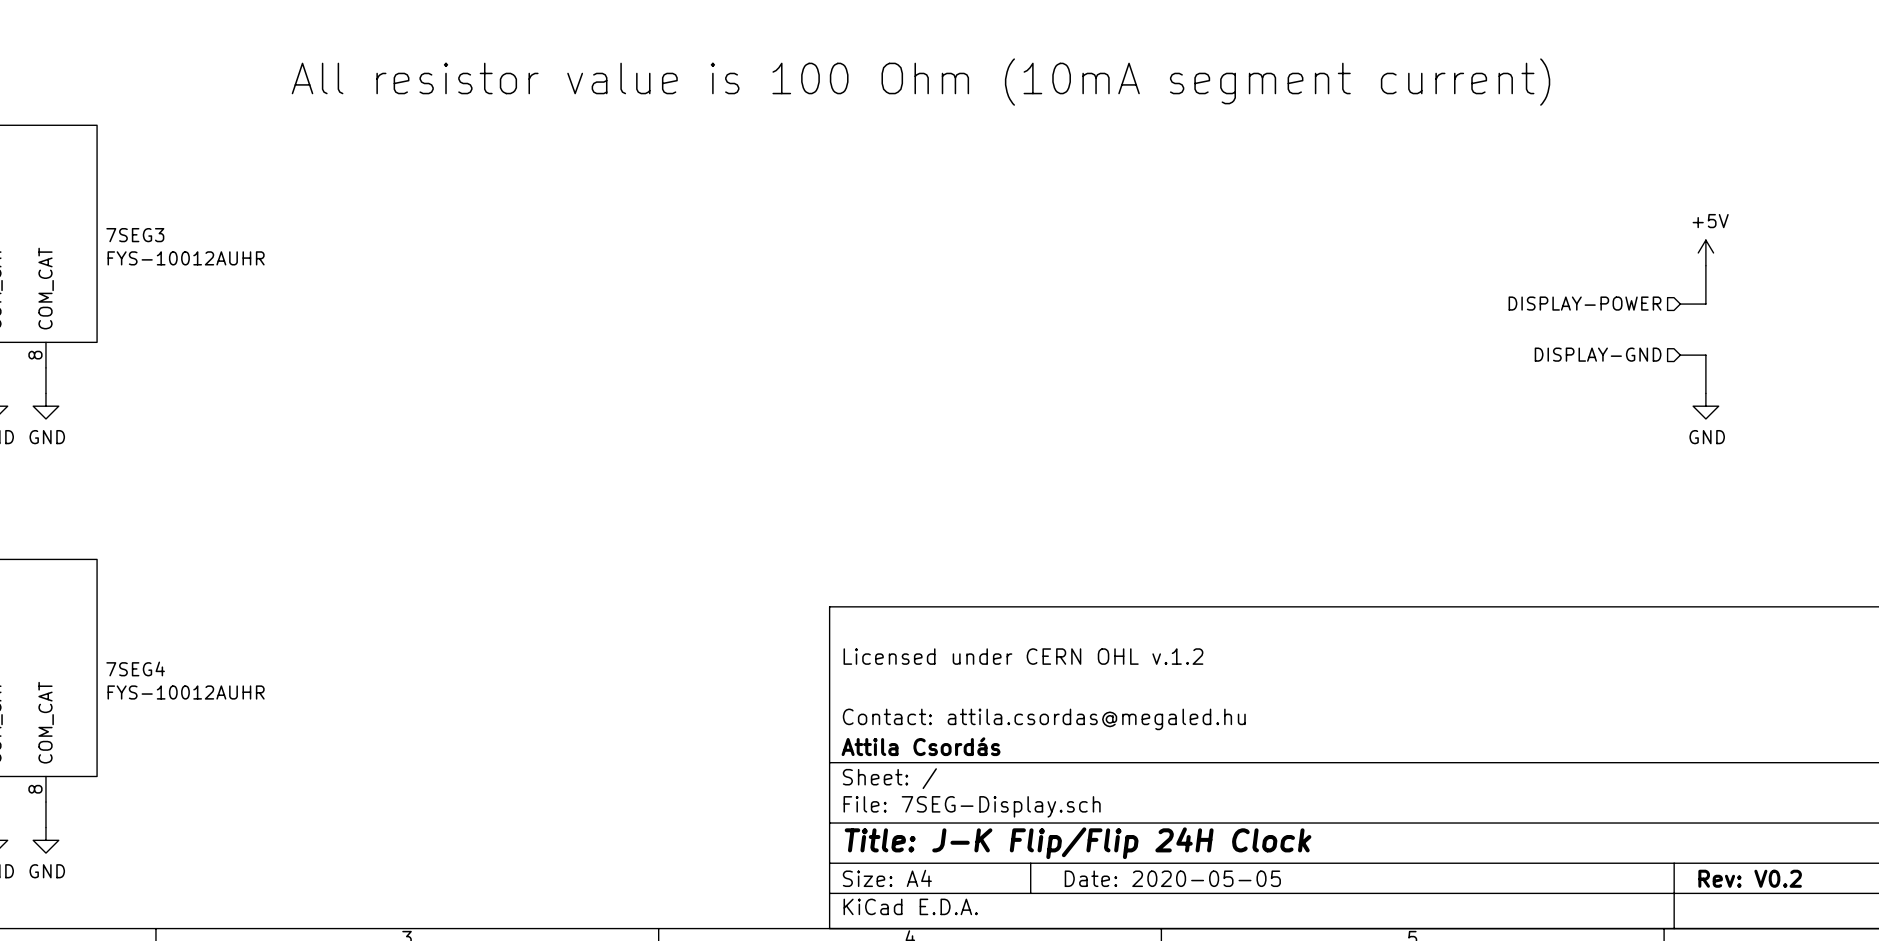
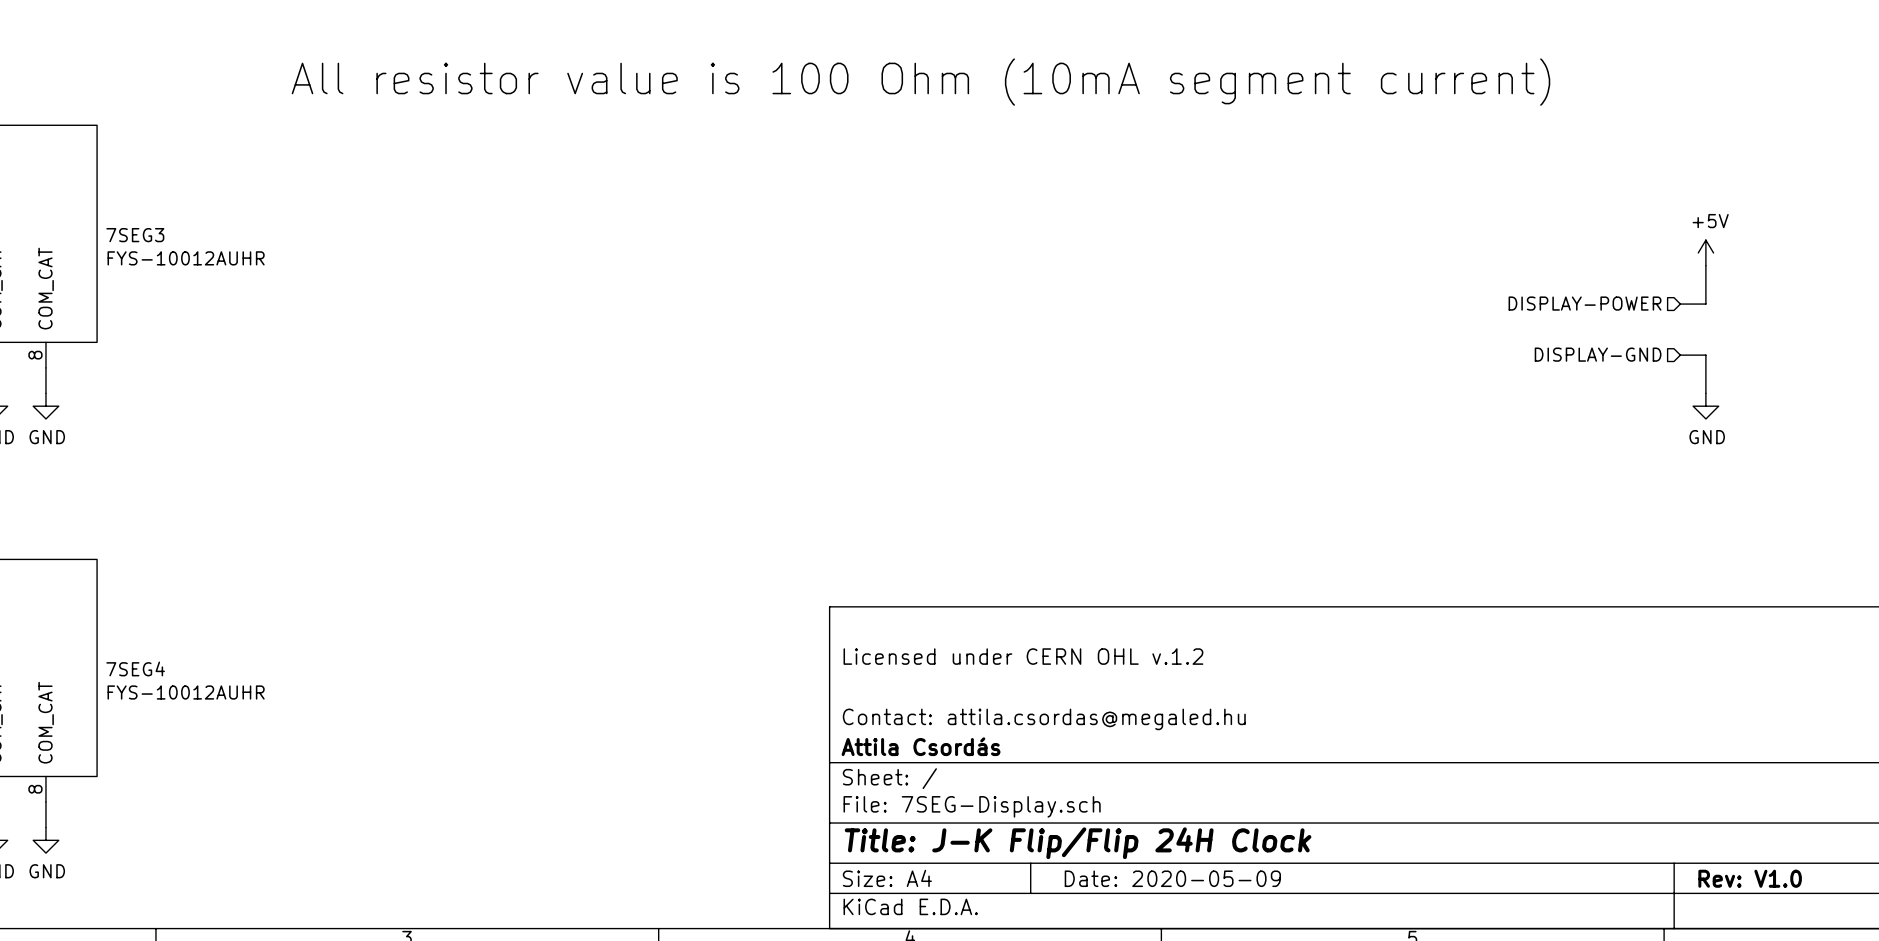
title block: Date: 2020-05-05 (1172, 878) -> Date: 2020-05-09 (1172, 878)
title block: Rev: V0.2 (1750, 878) -> Rev: V1.0 (1750, 878)

